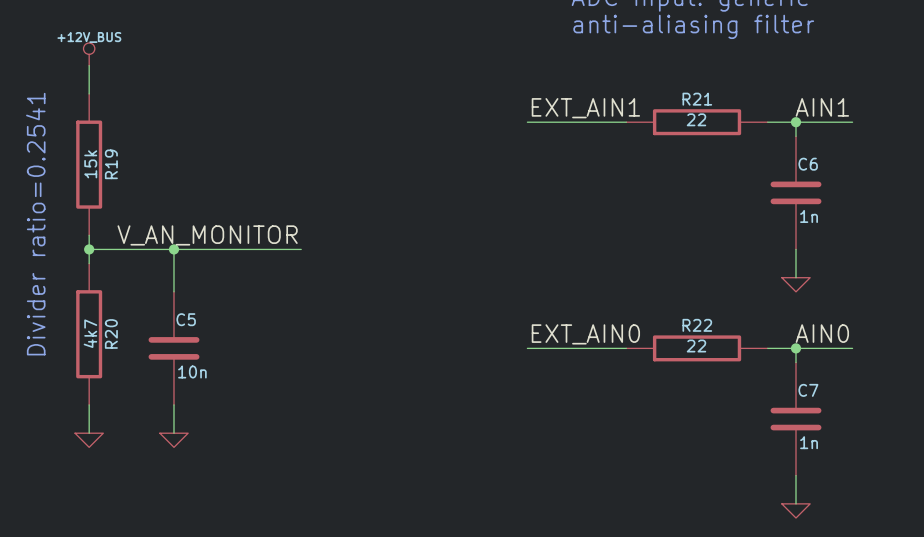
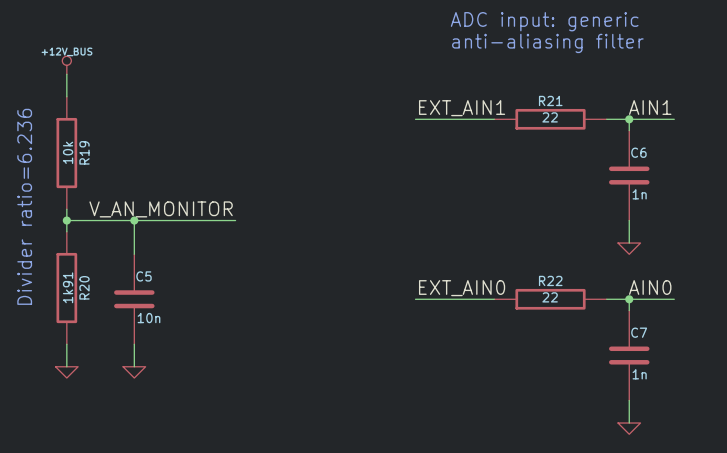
R19 value: 15k (90, 164) -> 10k (68, 152)
text: Divider ratio=0.2541 (35, 224) -> Divider ratio=6.236 (24, 206)
R20 value: 4k7 (90, 333) -> 1k91 (68, 287)

